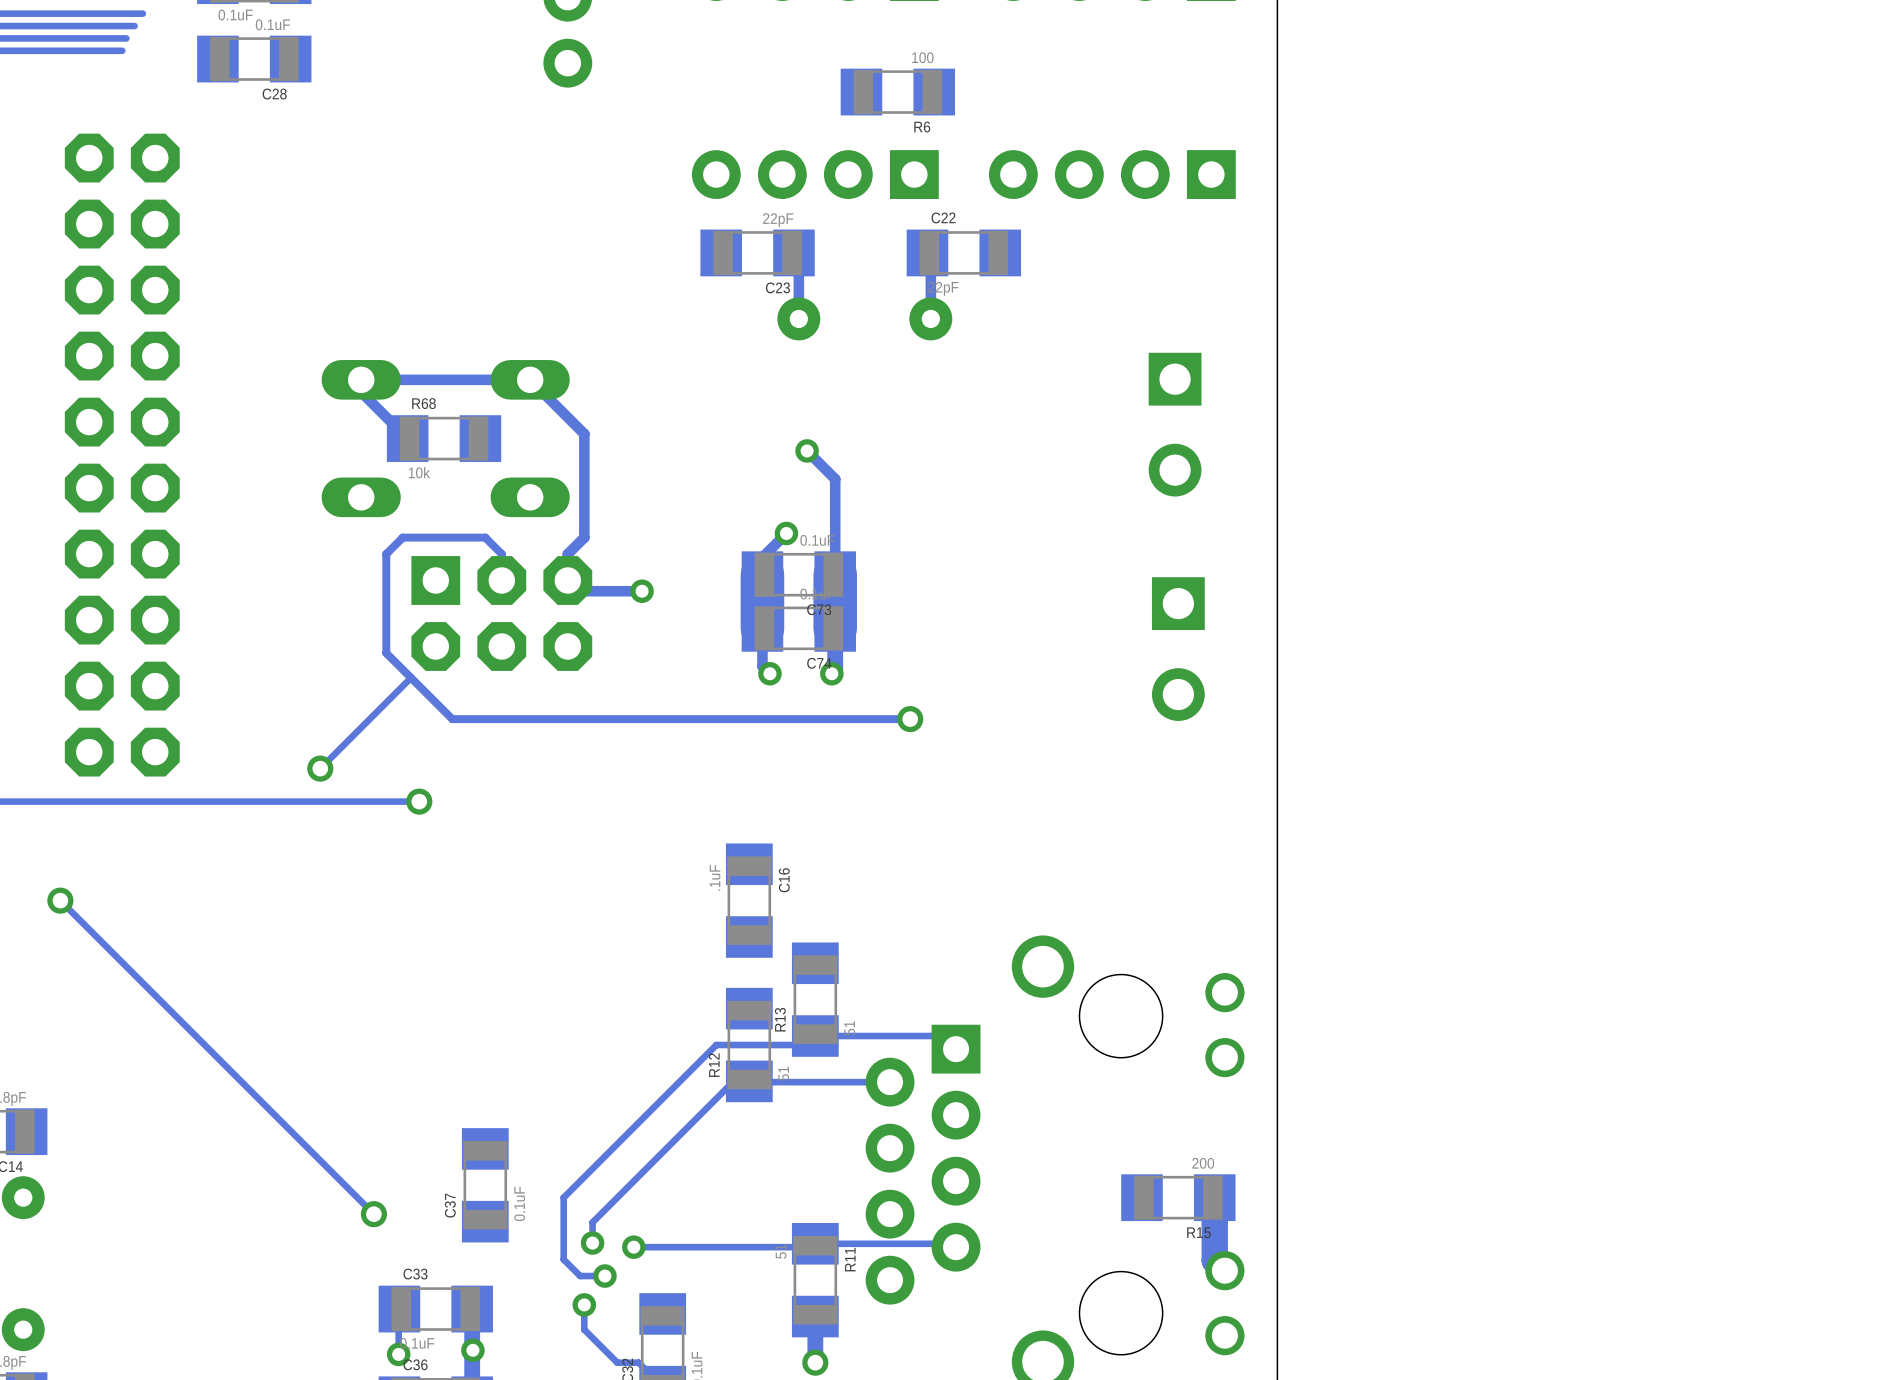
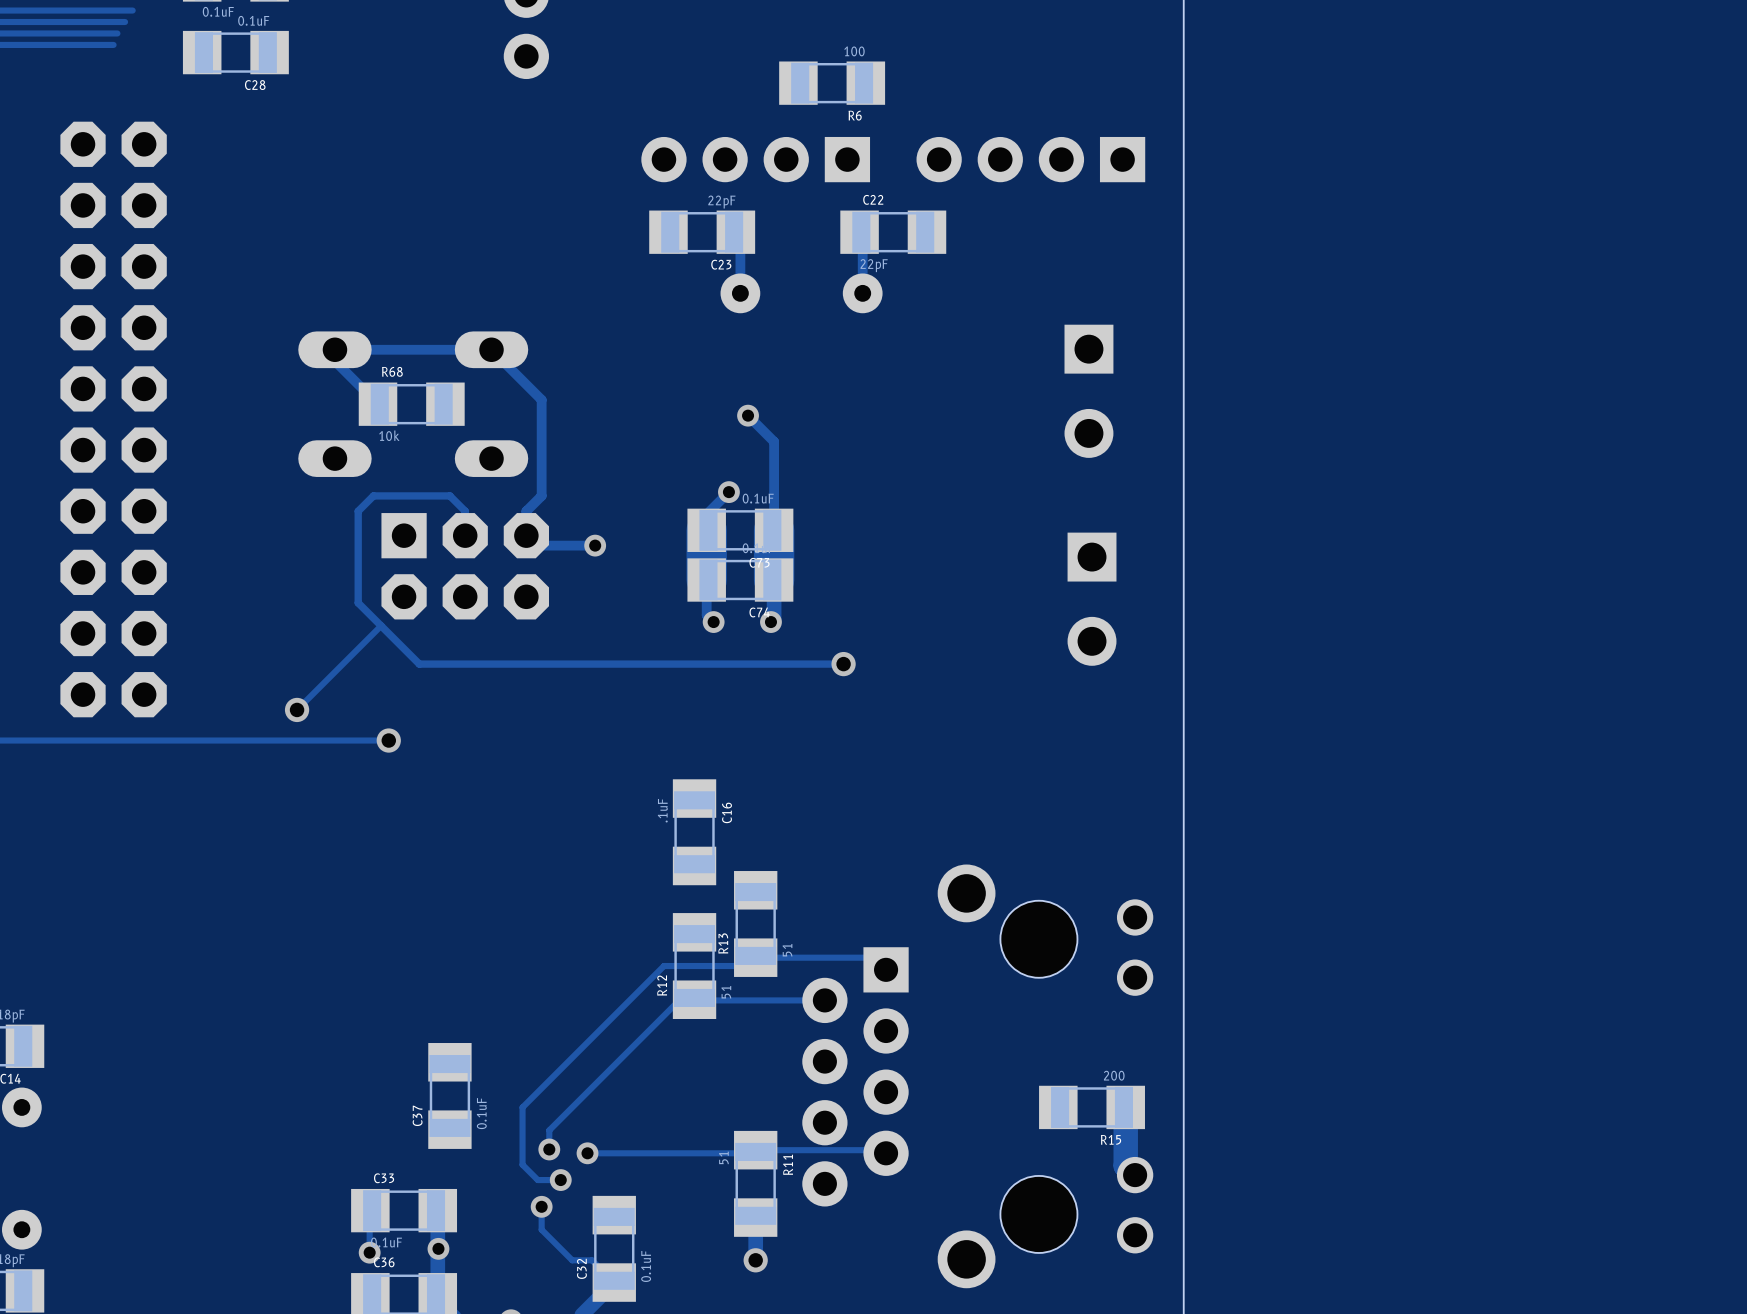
track: (60, 900) (373, 1214) -> none
via: (60, 900) -> none
via: (373, 1214) -> none

